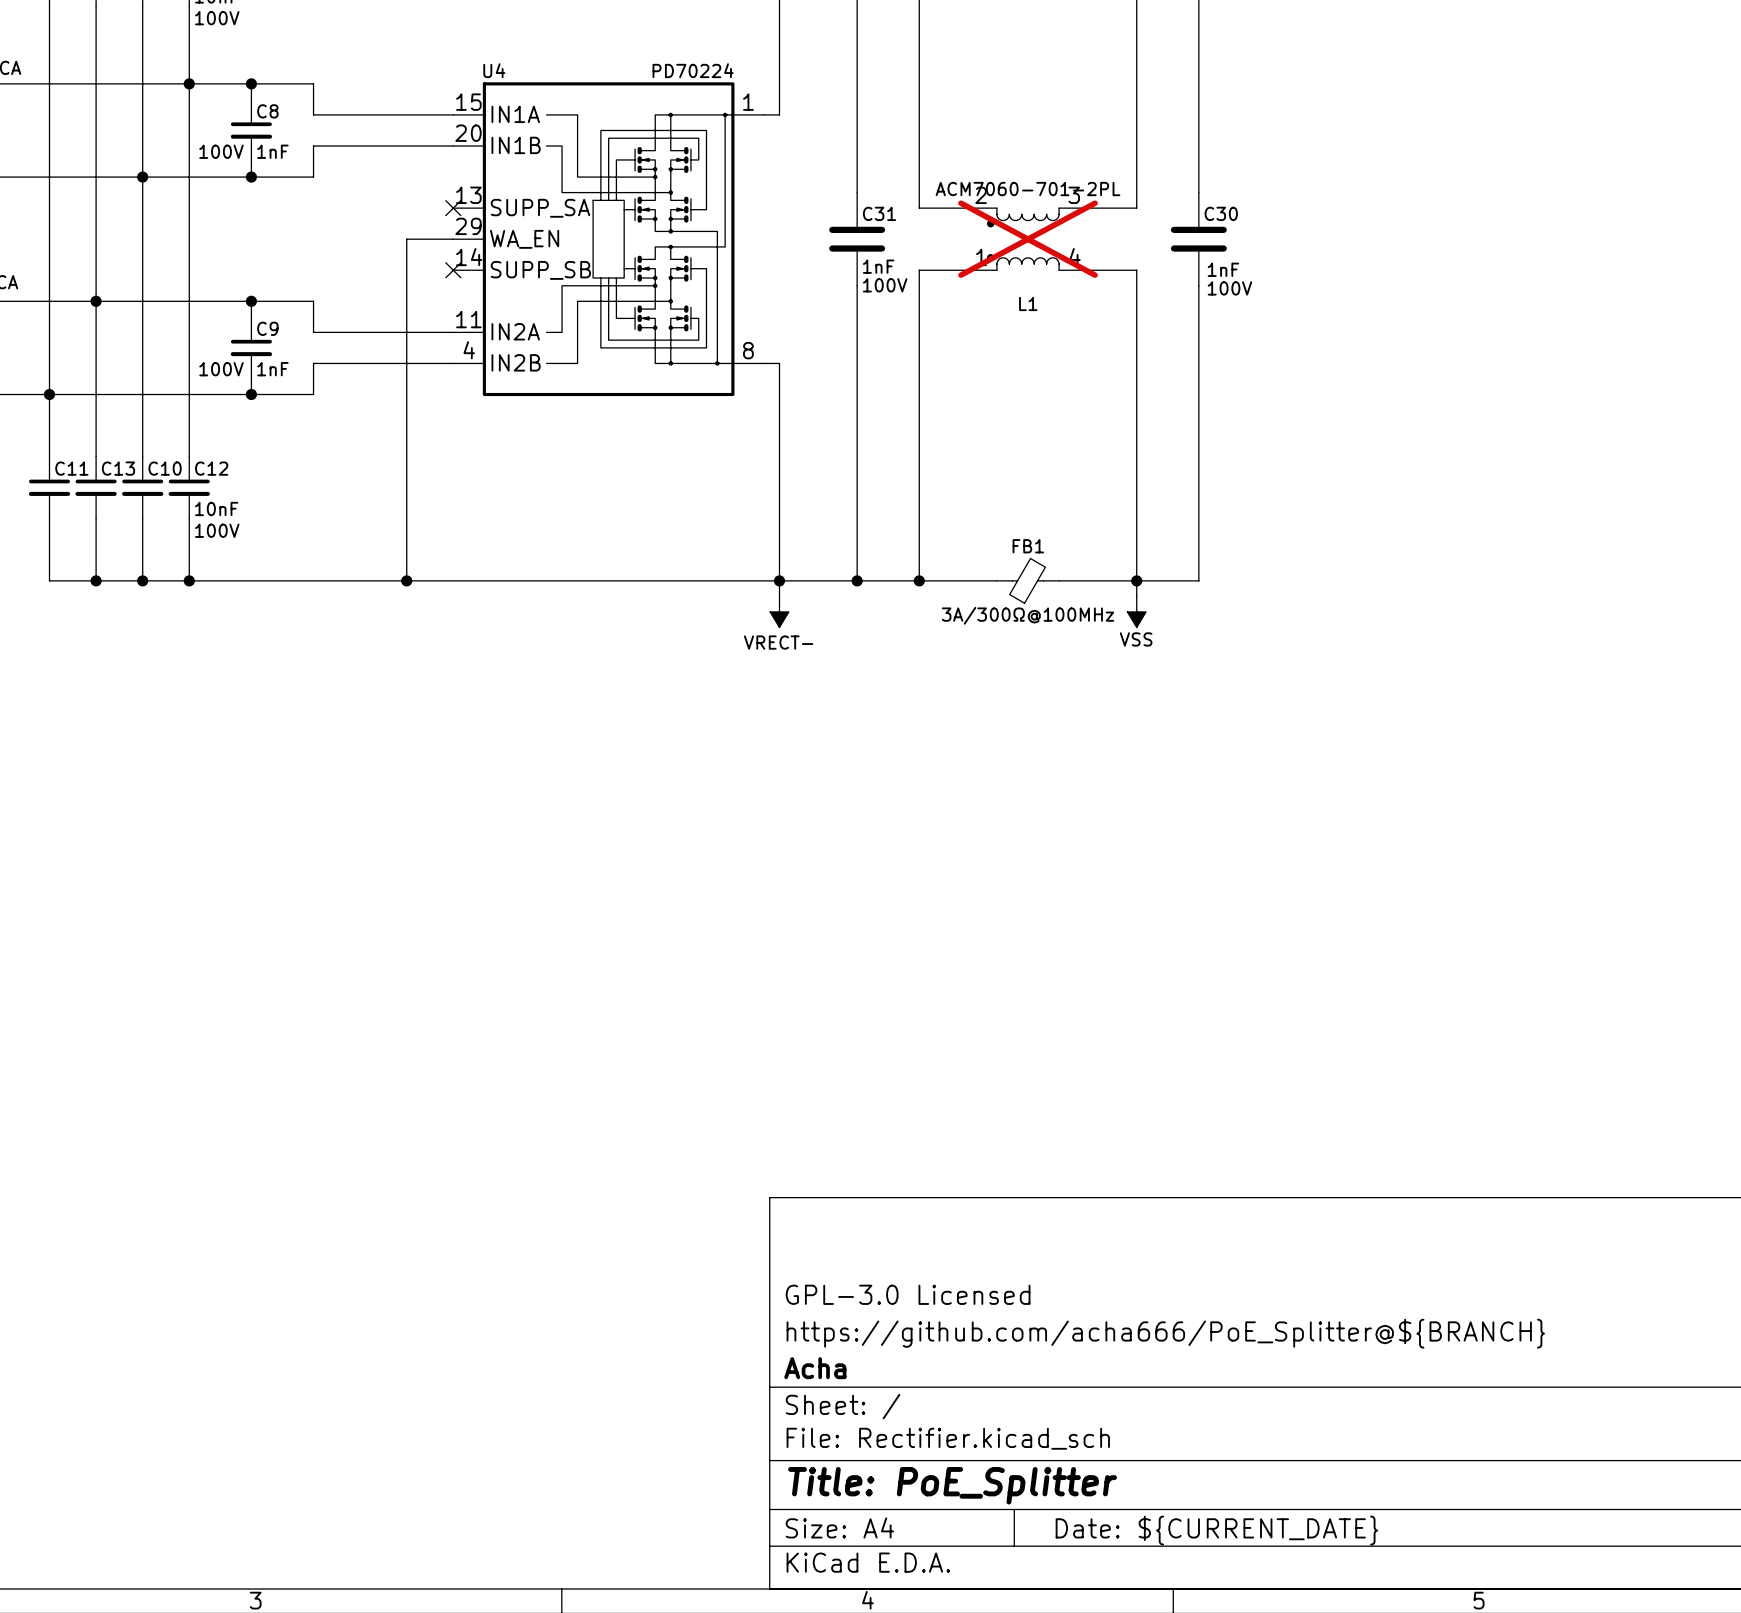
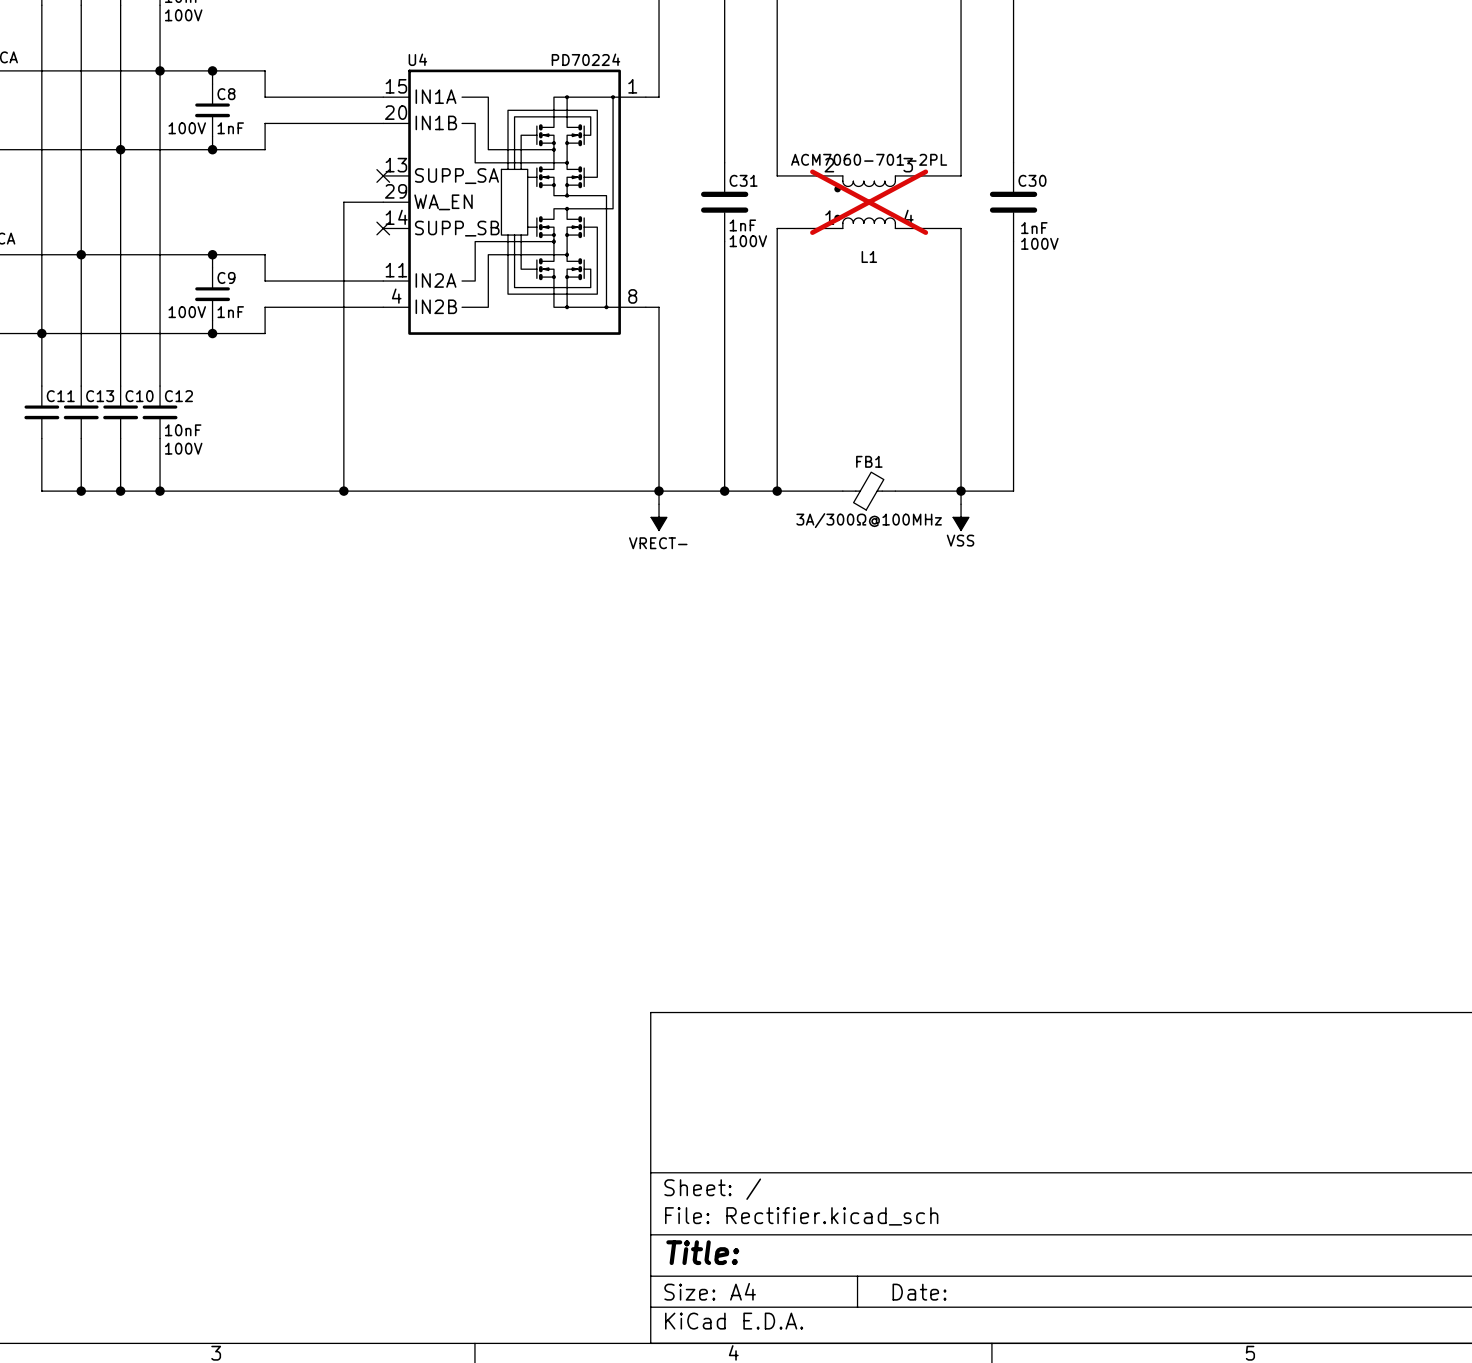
title block: GPL-3.0 Licensed (908, 1294) -> none
title block: https://github.com/acha666/PoE_Splitter@${BRANCH} (1165, 1333) -> none
title block: Acha (815, 1368) -> none
title block: Title: PoE_Splitter (952, 1485) -> Title: (702, 1252)
title block: Date: ${CURRENT_DATE} (1216, 1530) -> Date: (919, 1292)

